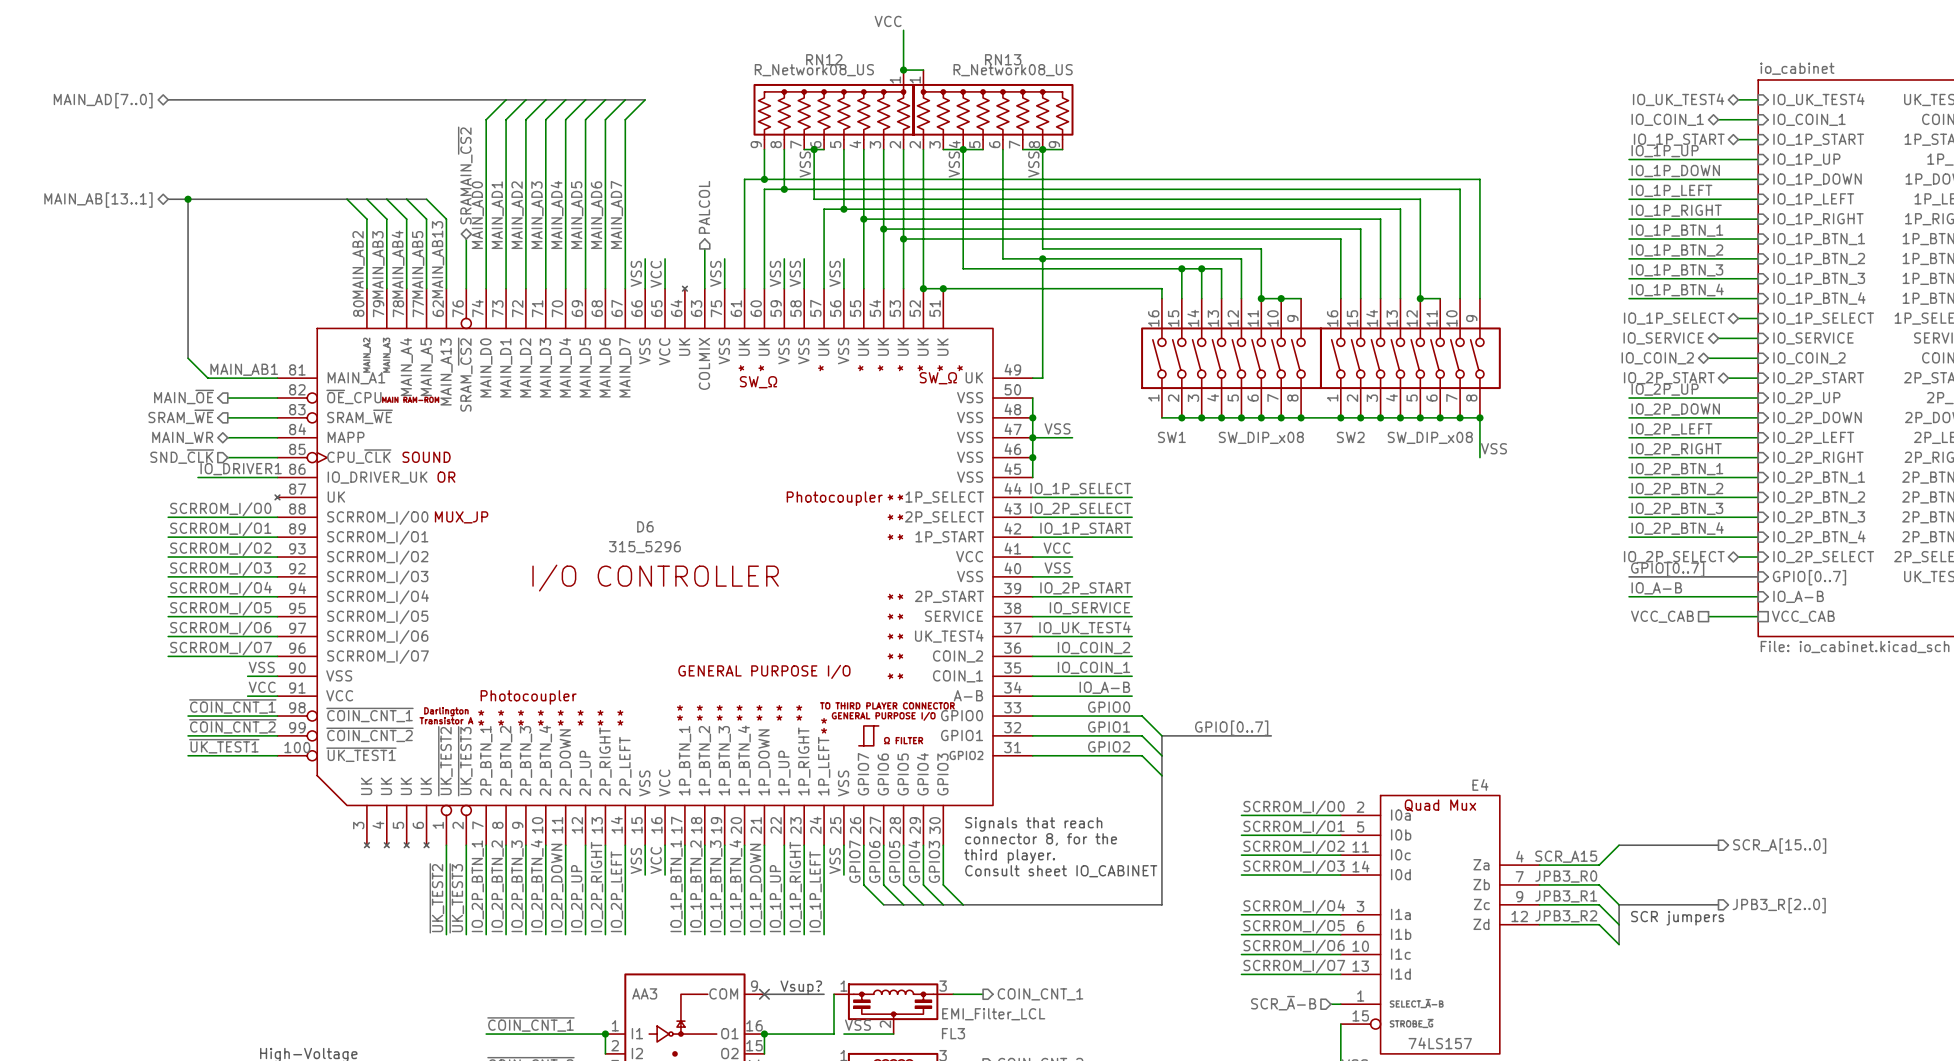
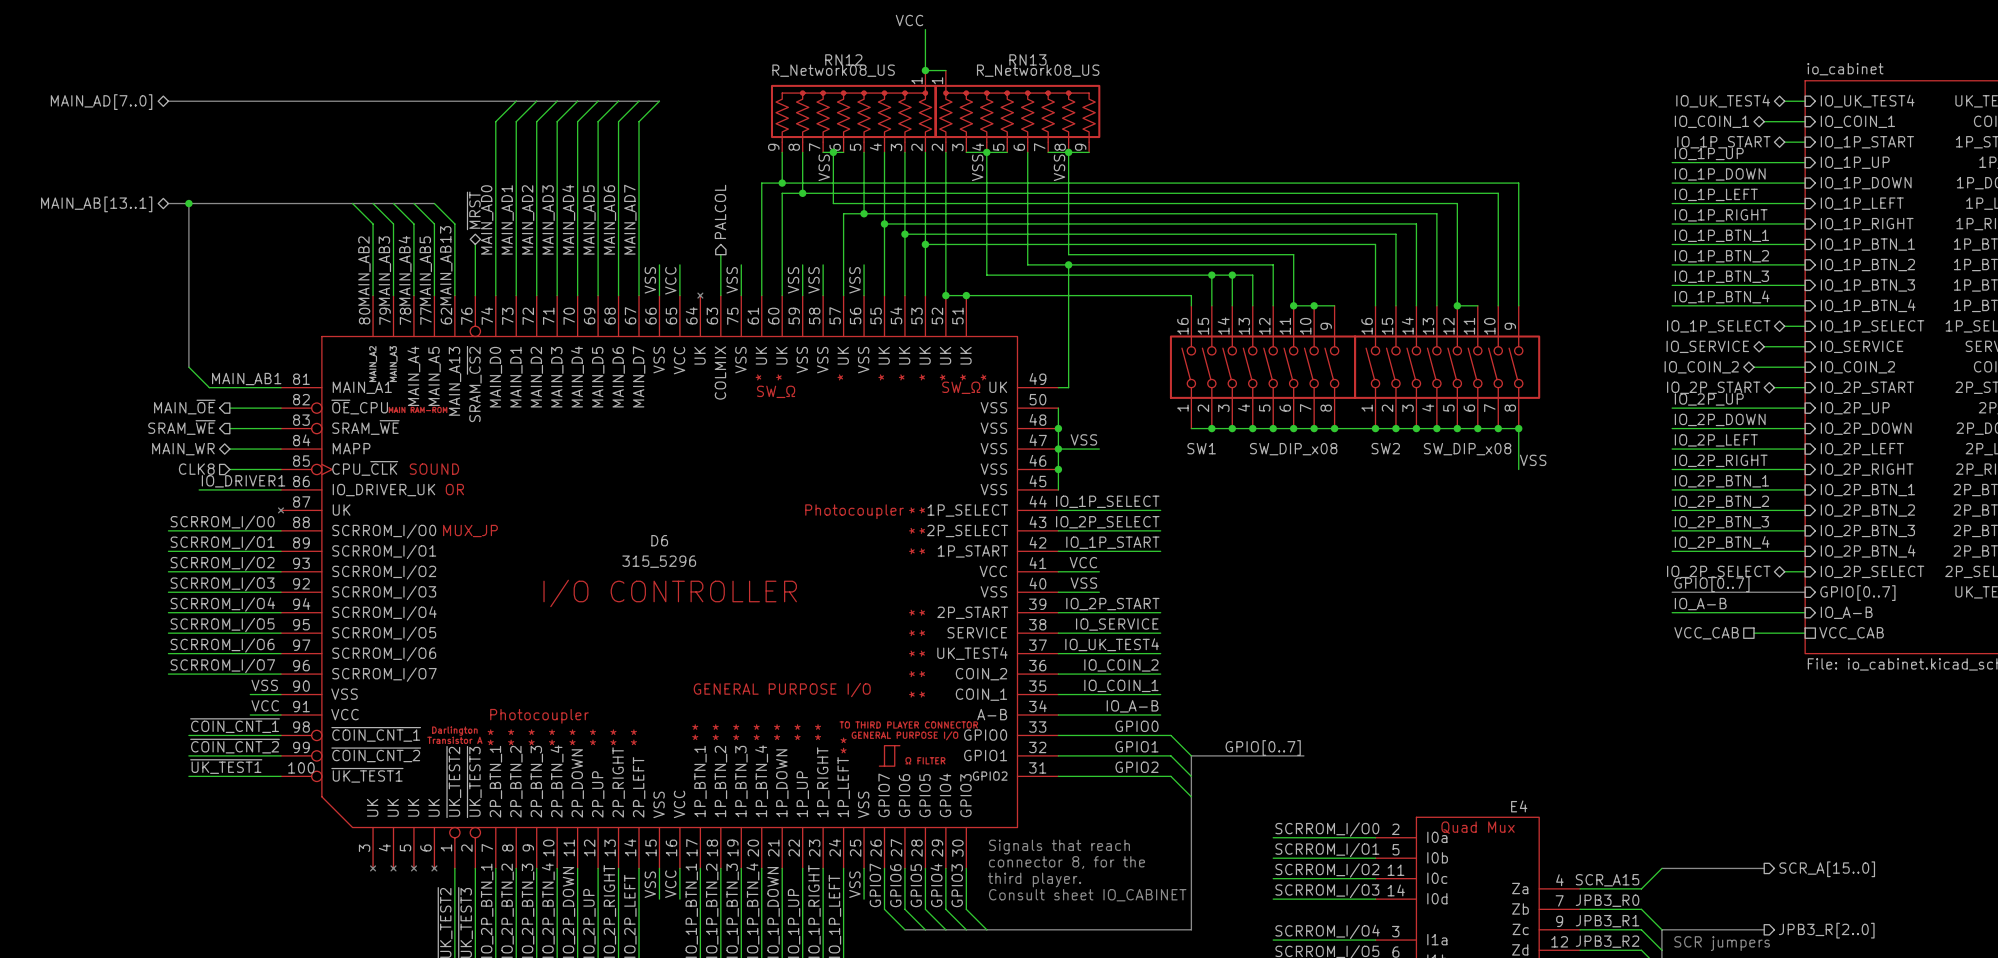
hierarchical label: SRAMAIN_~{CS2} (465, 175) -> ~{MRST} (473, 210)
hierarchical label: SND_~{CLK} (182, 456) -> CLK8 (196, 469)

